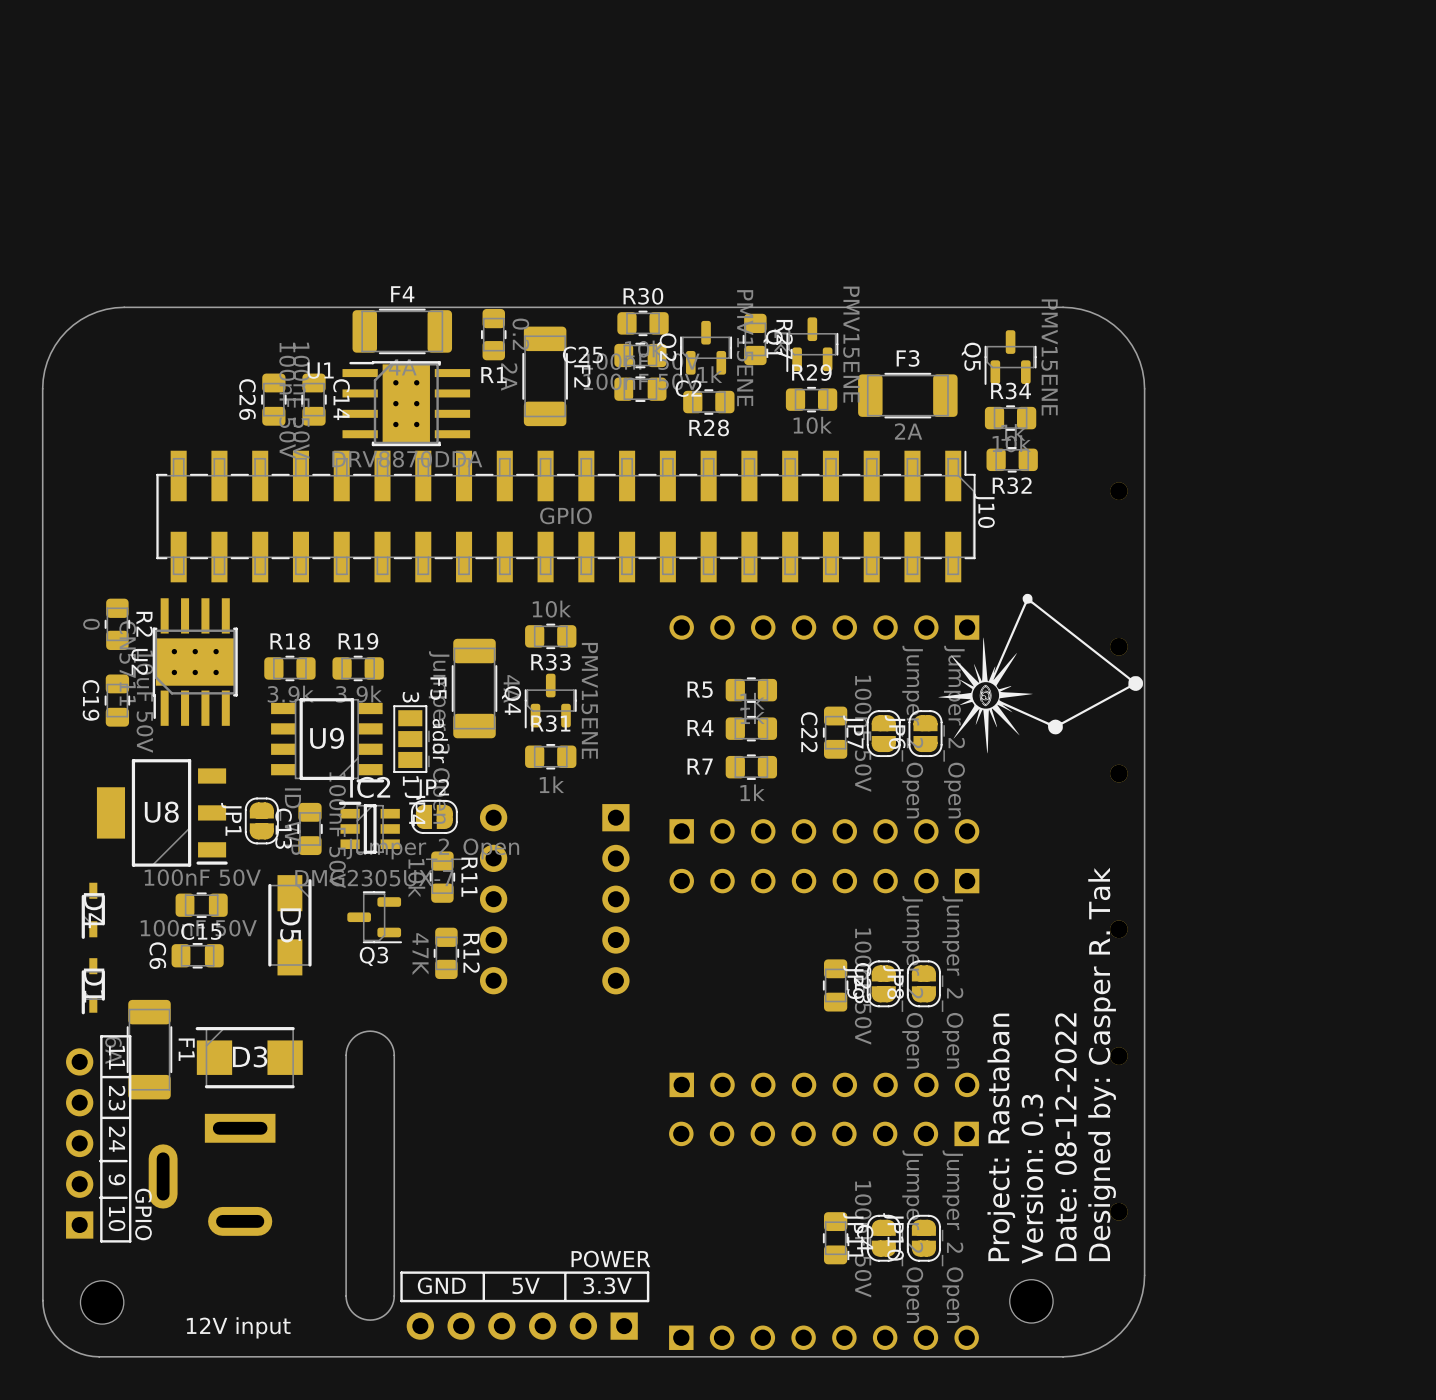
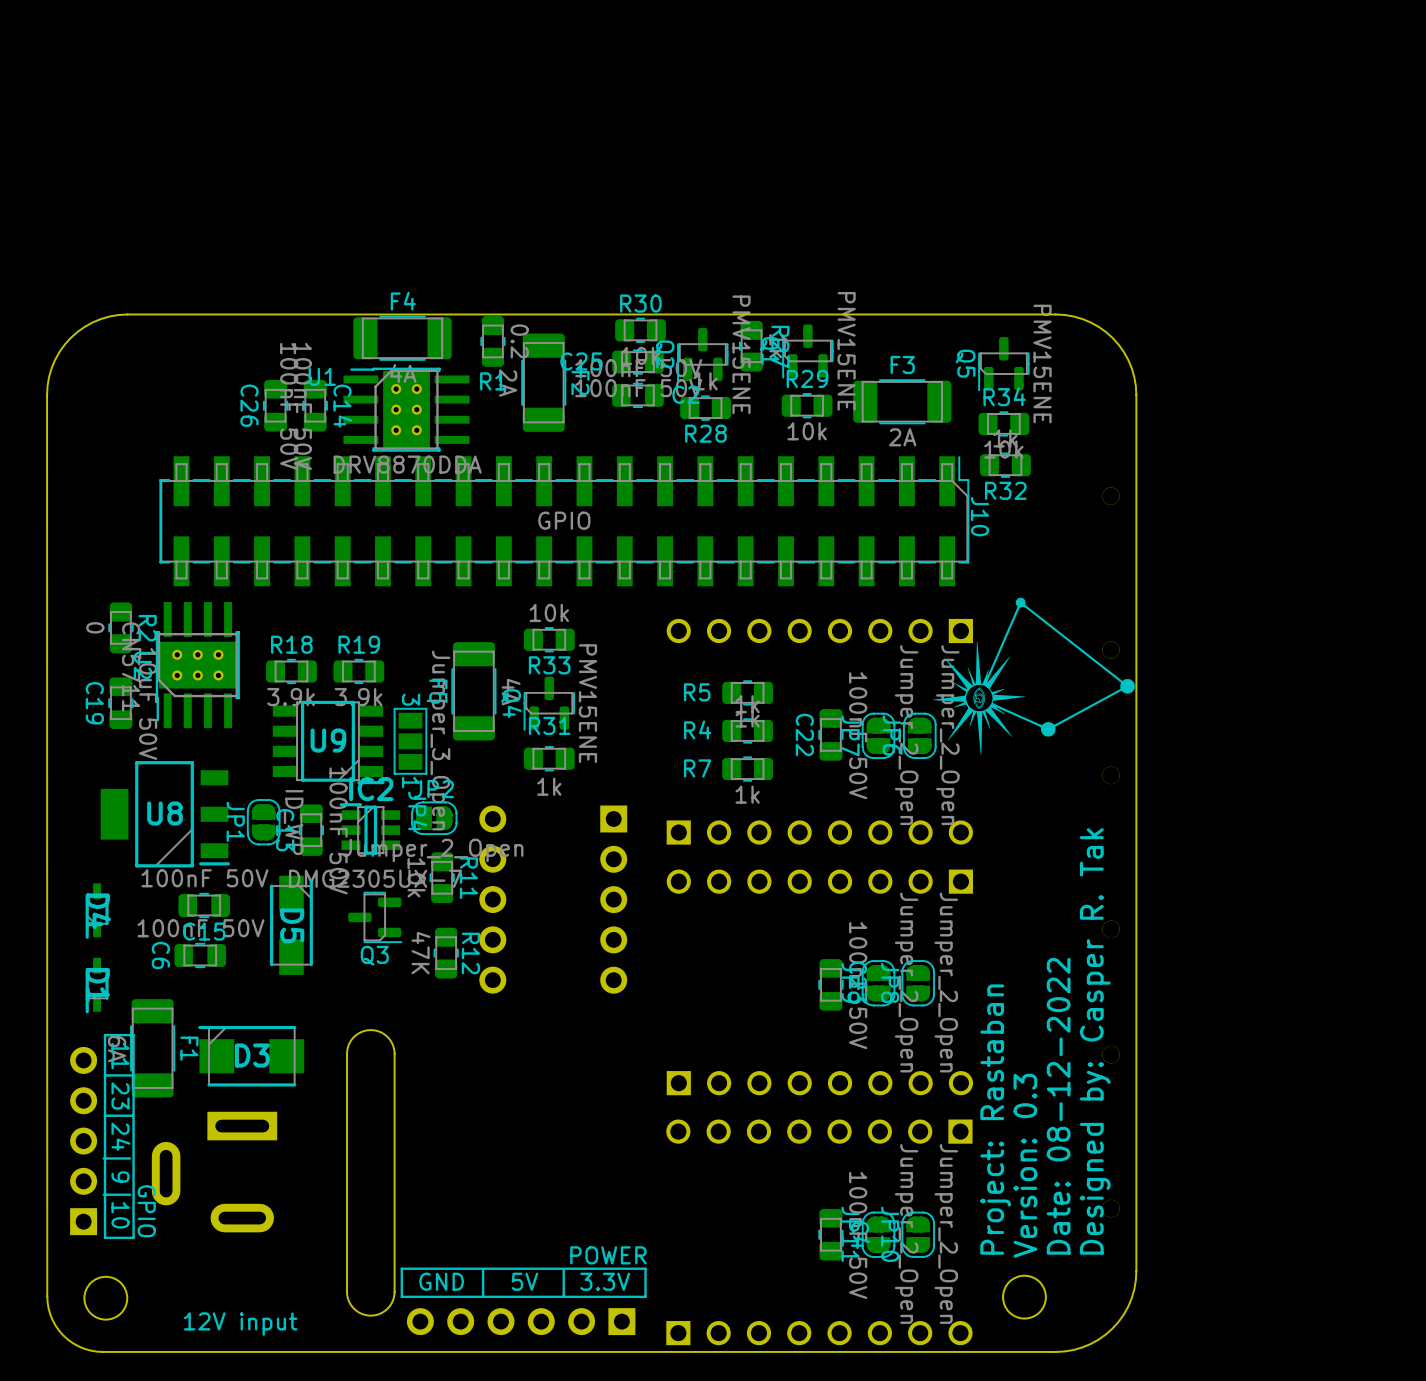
text: addr (440, 741) -> none

